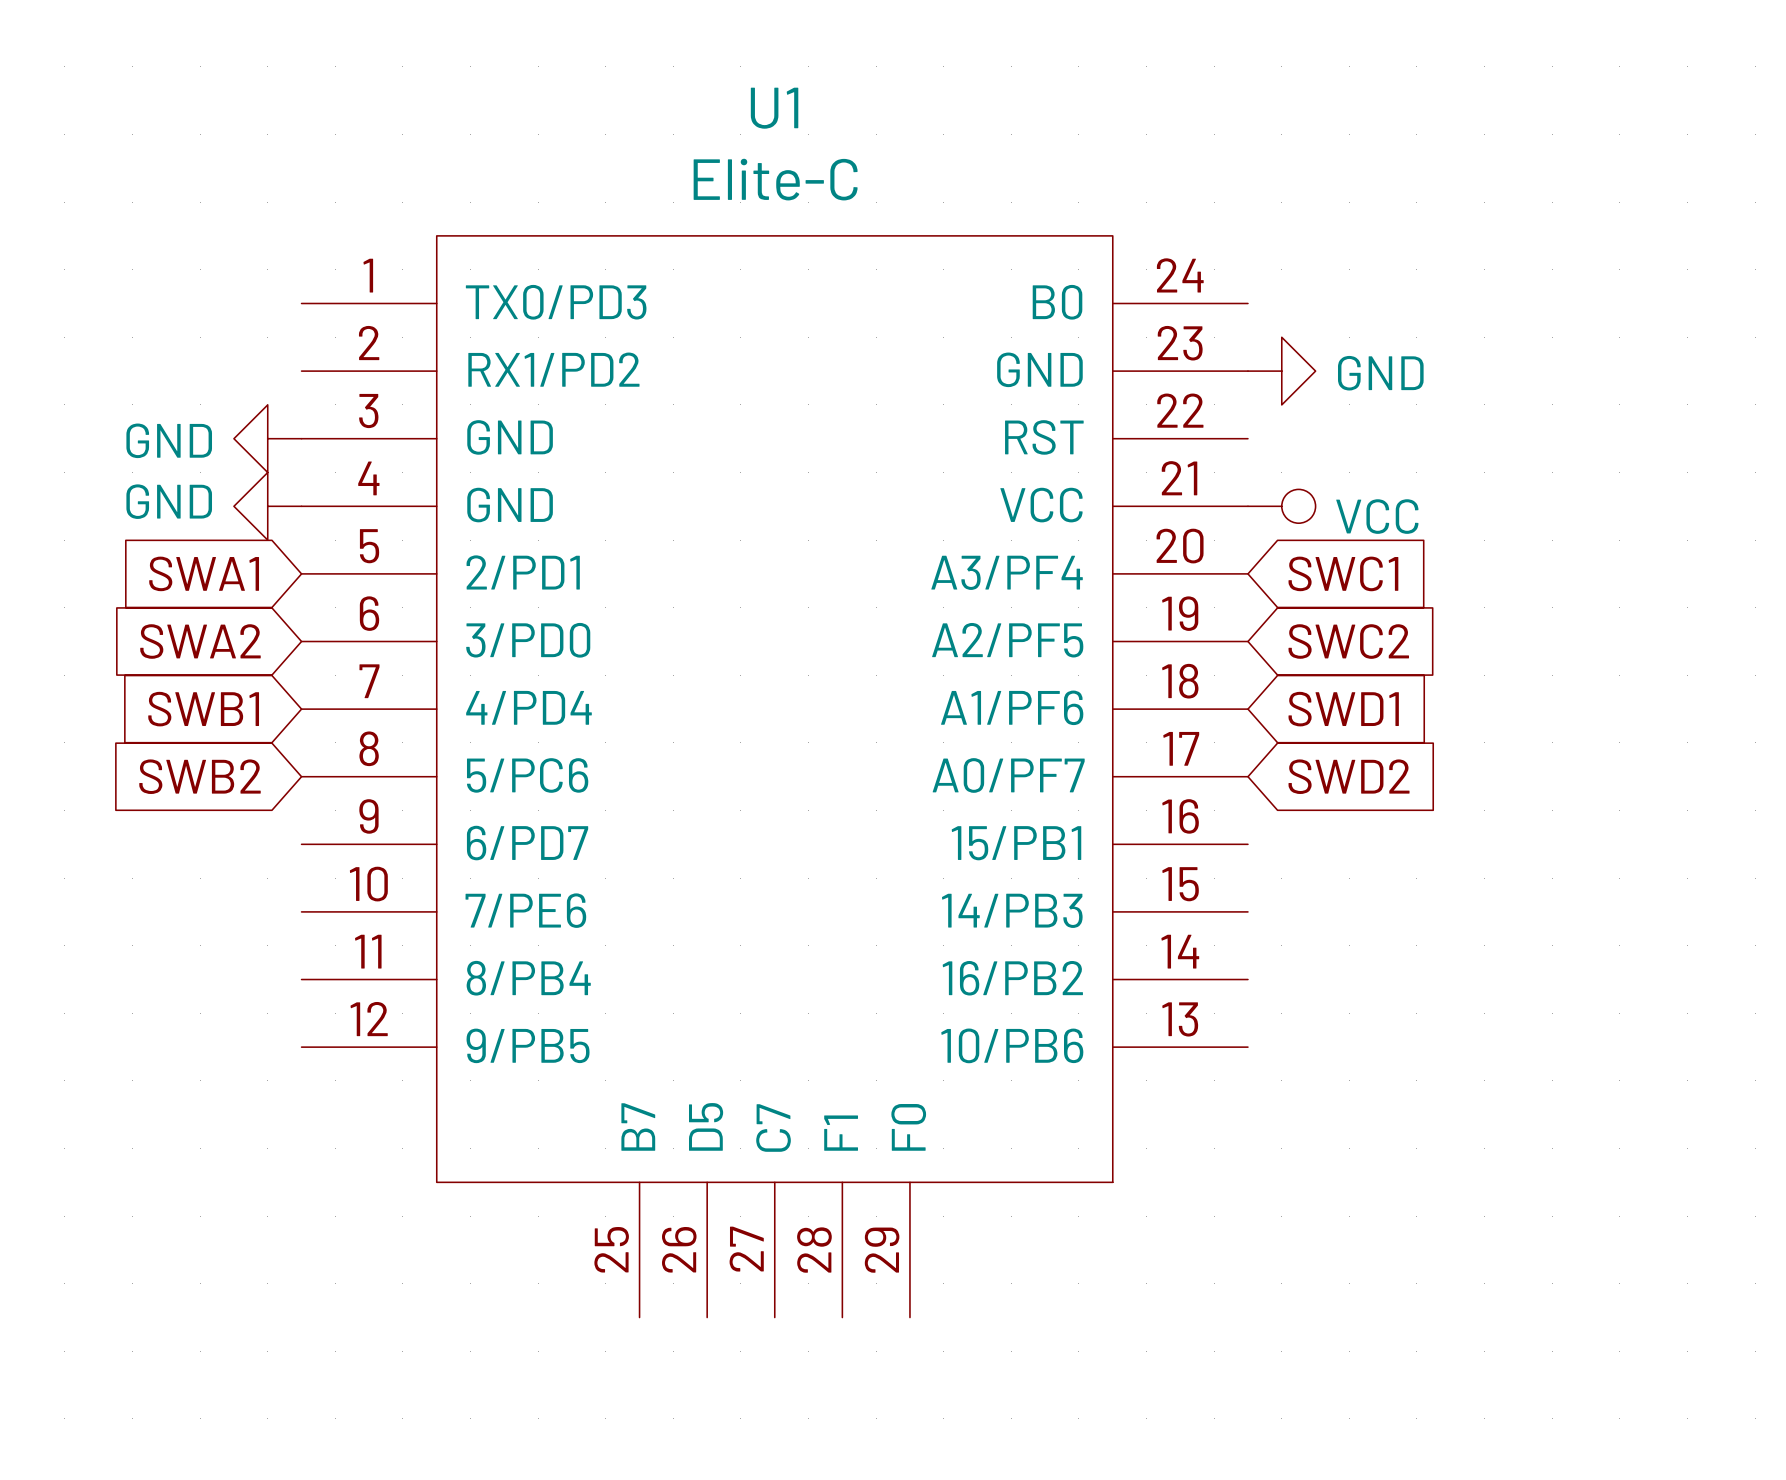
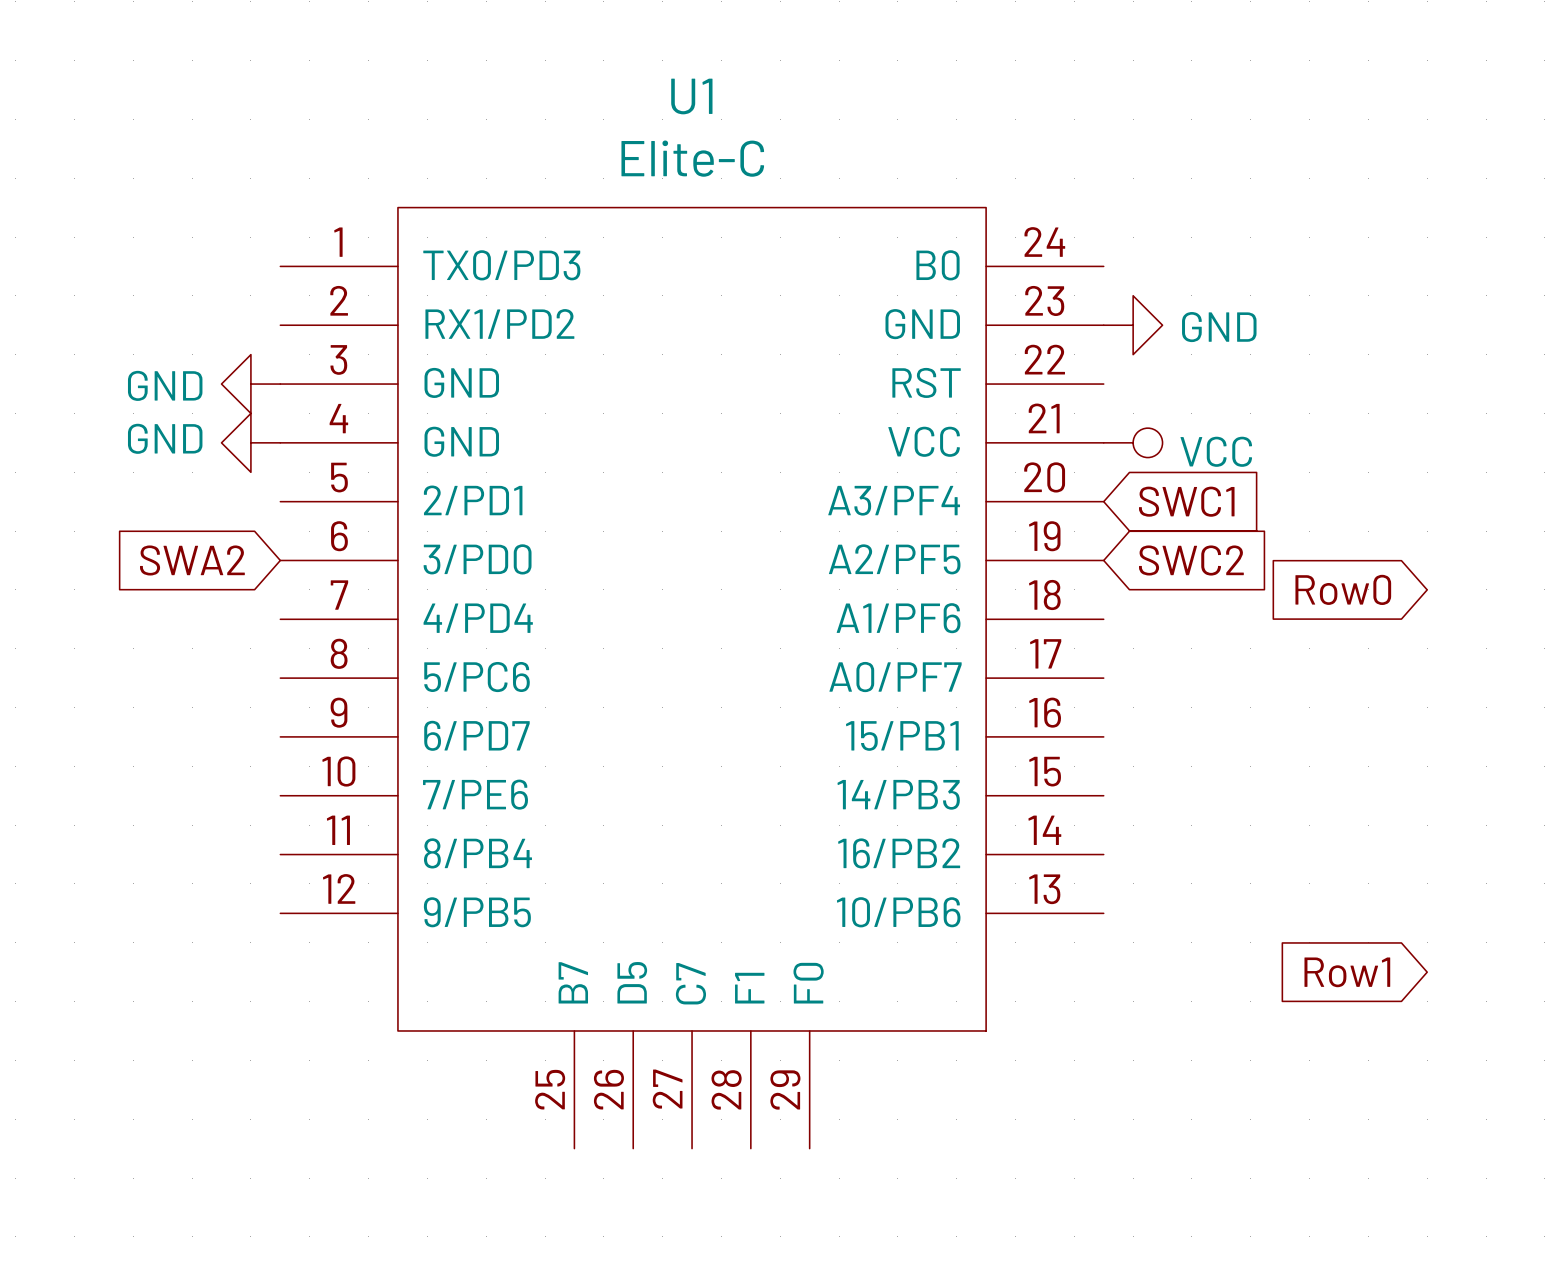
global label: SWA1 (204, 573) -> none
global label: none -> Row0 (1343, 589)
global label: SWB1 (203, 709) -> none
global label: SWD1 (1343, 709) -> none
global label: SWB2 (199, 776) -> none
global label: SWD2 (1349, 776) -> none
global label: none -> Row1 (1347, 972)

